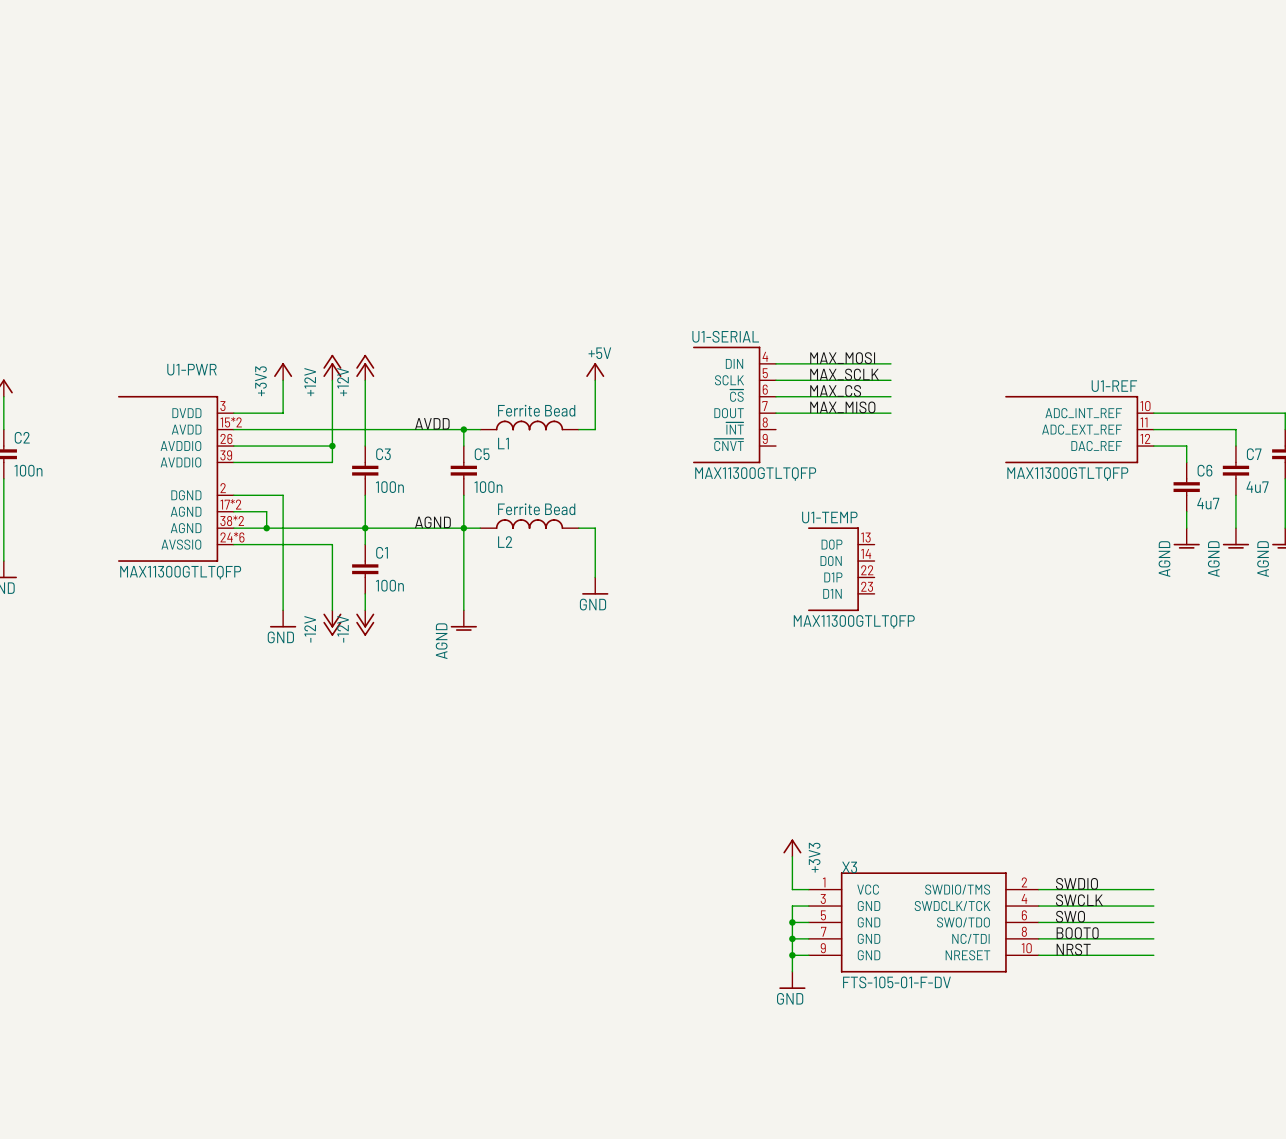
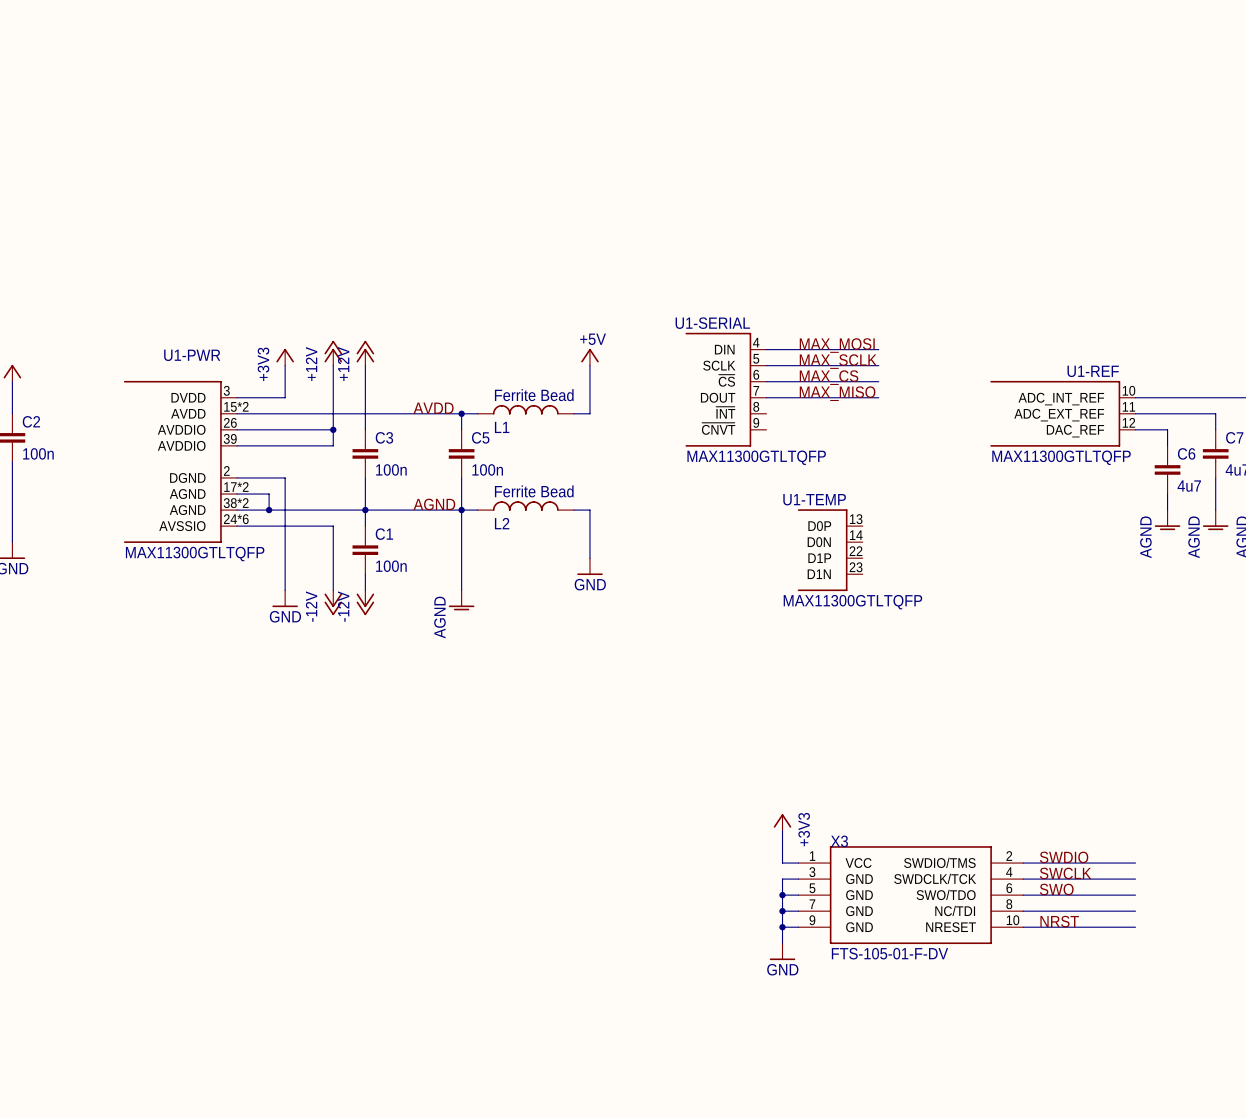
label: BOOT0 (1077, 933) -> none

